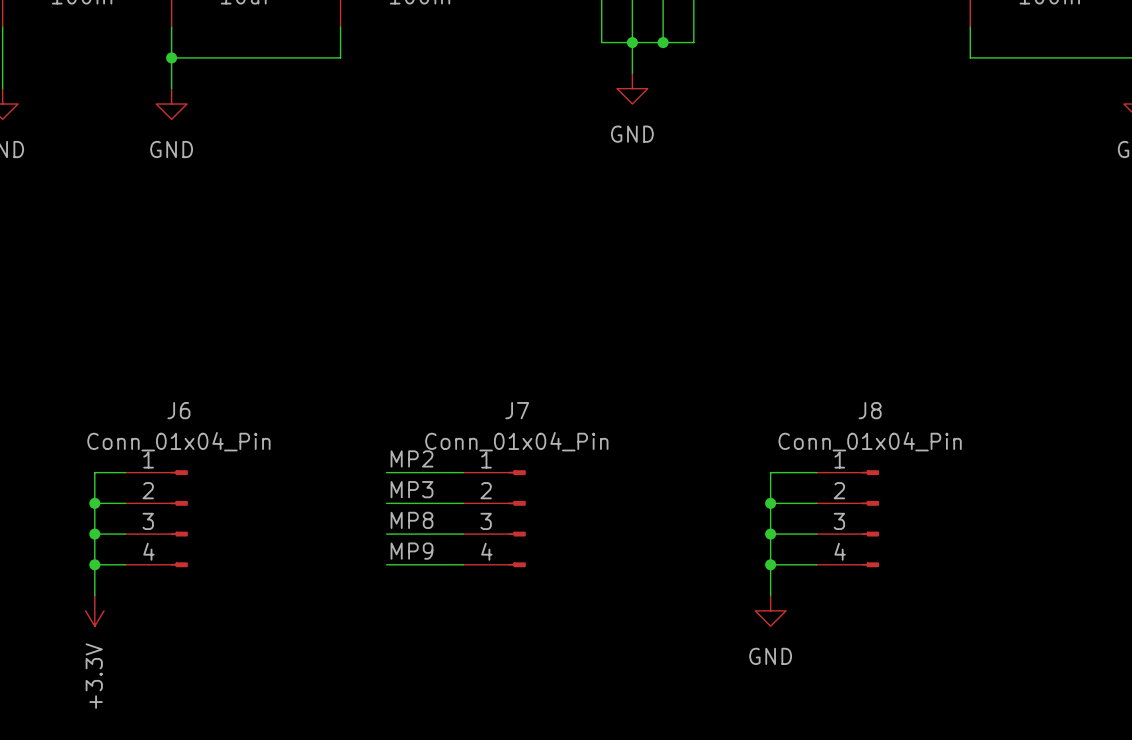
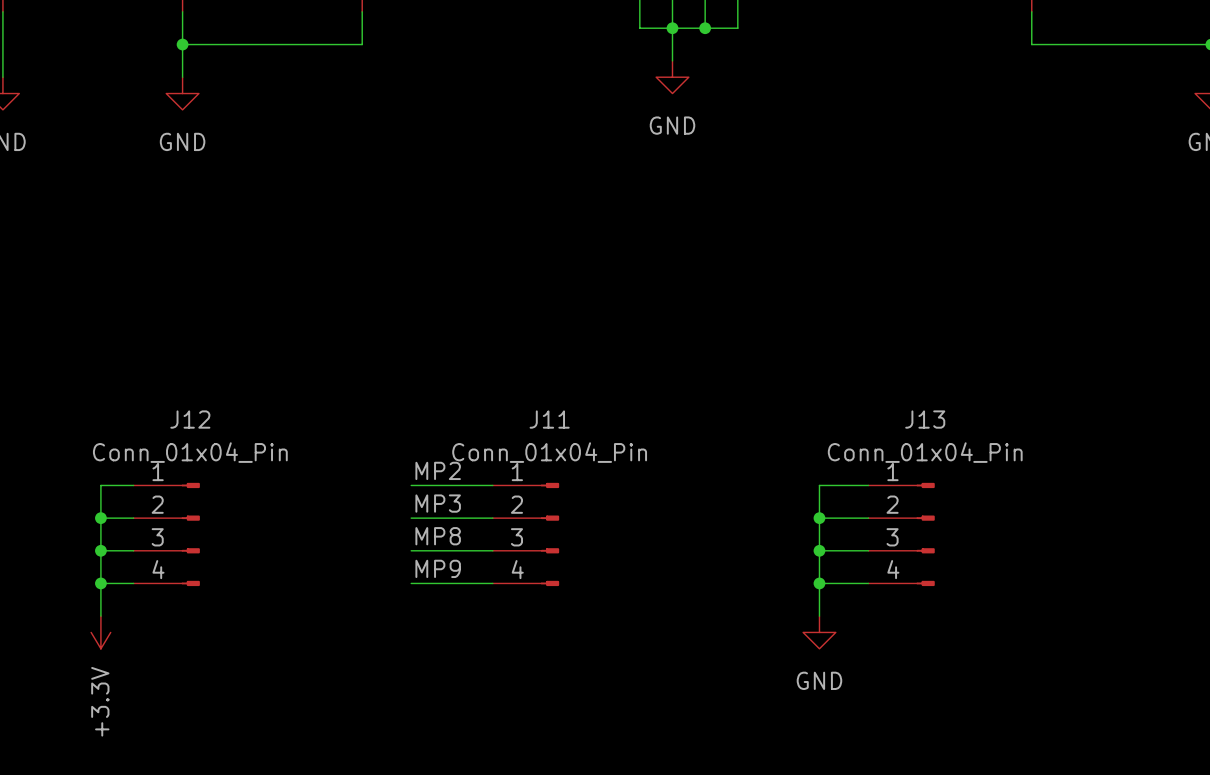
J6 name: J6 (178, 410) -> J12 (190, 419)
J7 name: J7 (517, 410) -> J11 (549, 419)
J8 name: J8 (870, 410) -> J13 (925, 419)

